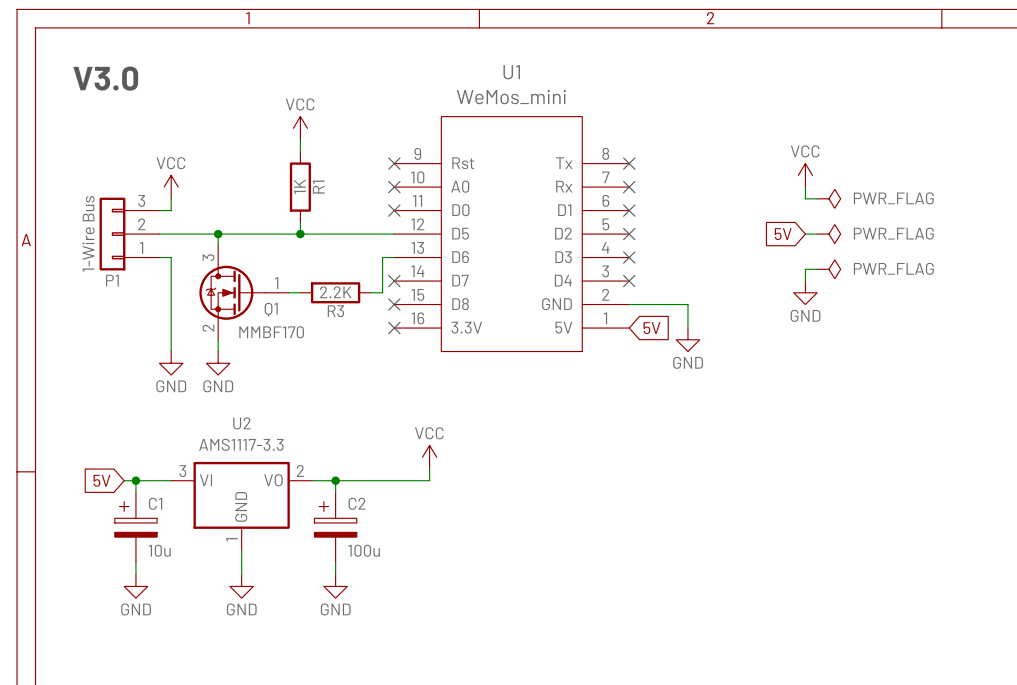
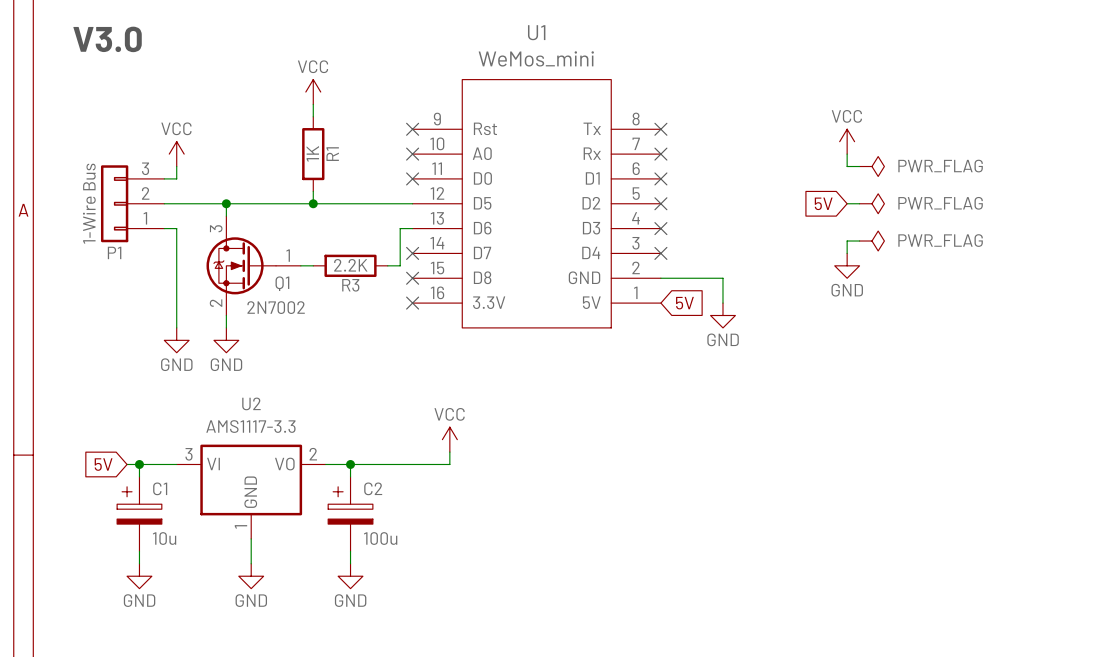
Q1 value: MMBF170 (271, 332) -> 2N7002 (276, 307)

